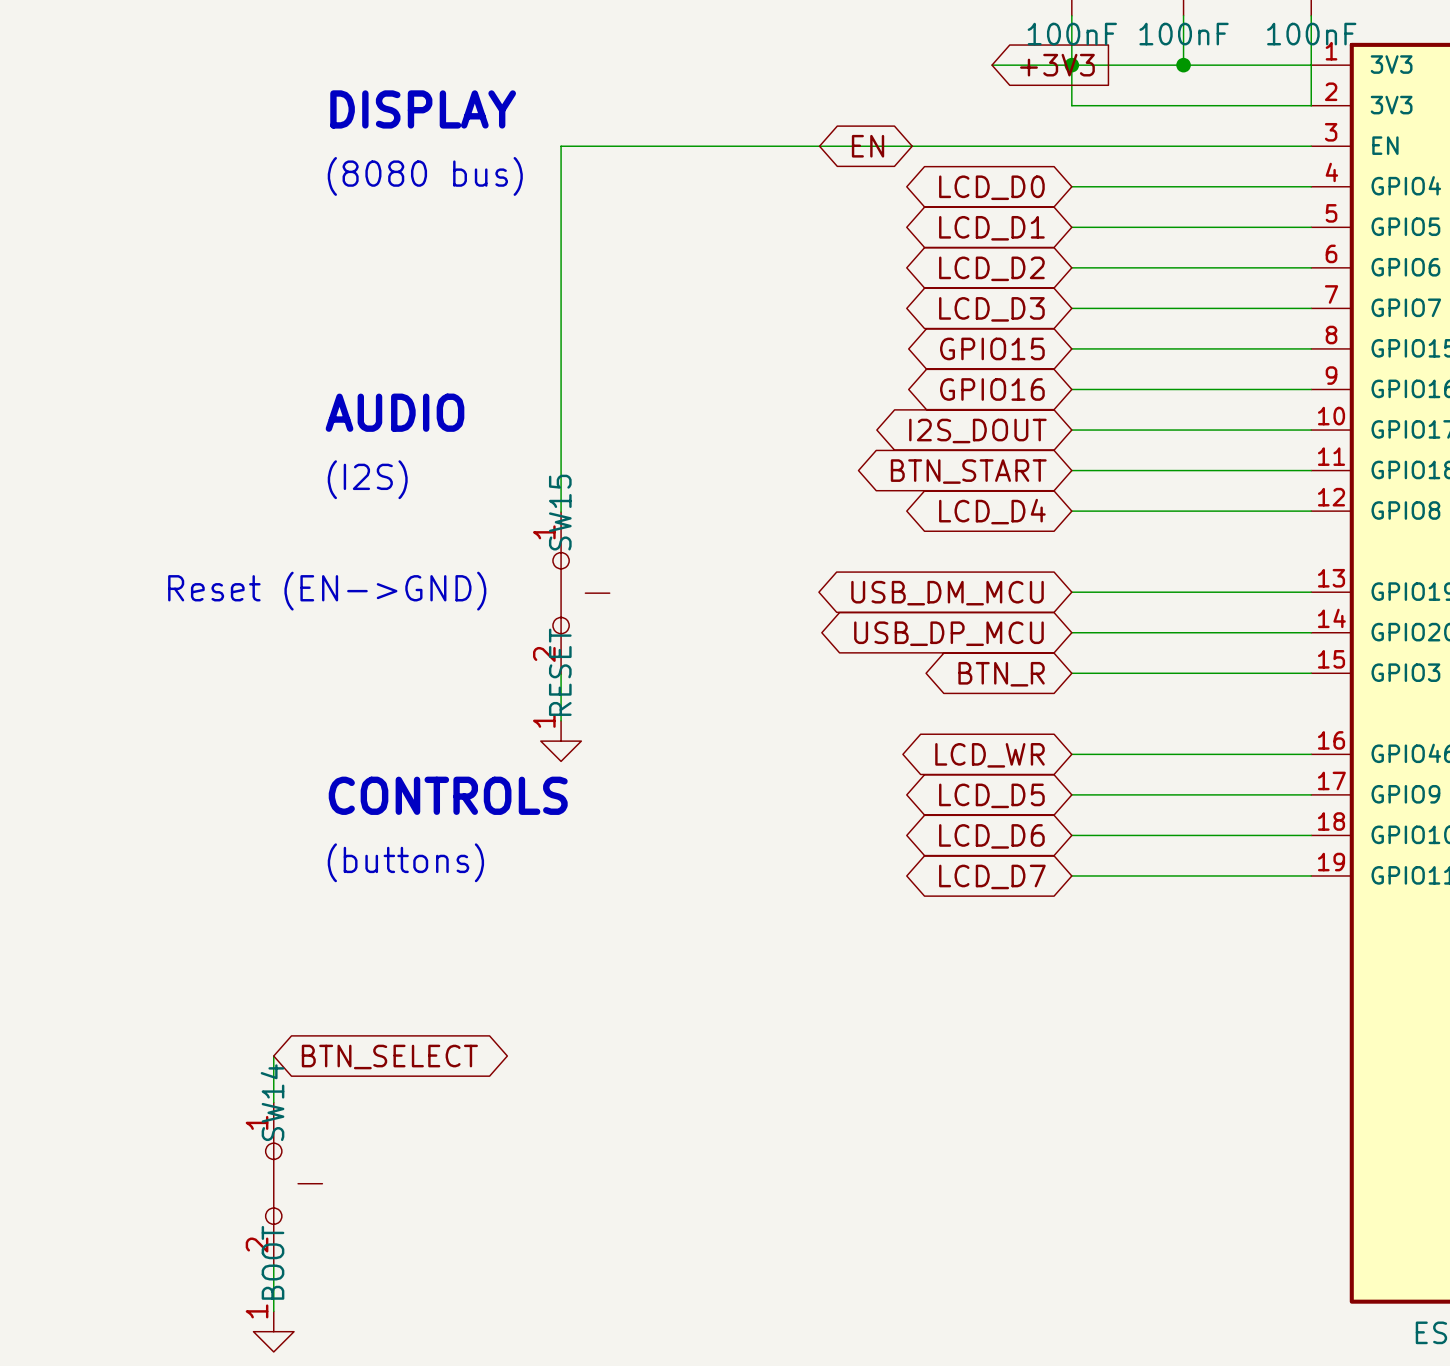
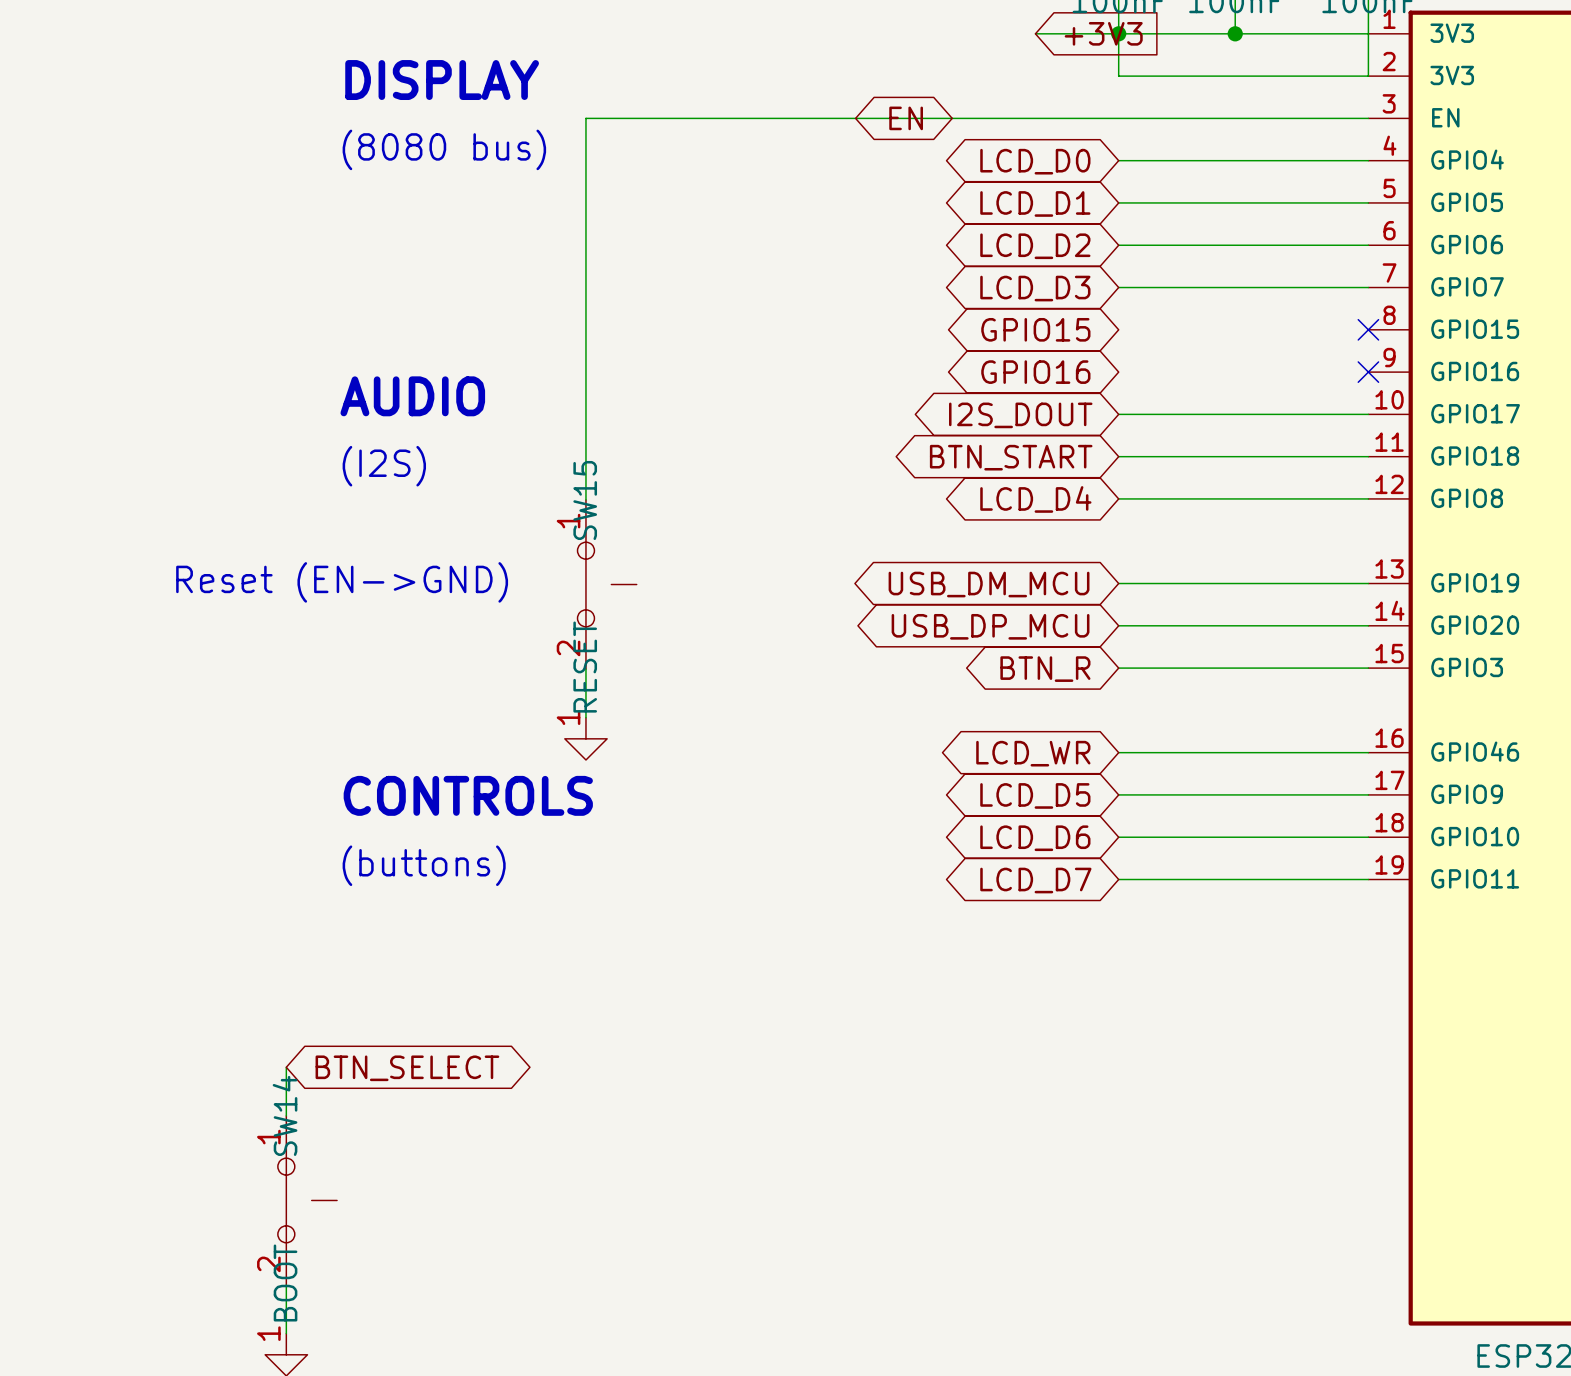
wire: (1071, 348) (1311, 348) -> none
no-connect mark: none -> (1368, 329)
wire: (1071, 389) (1311, 389) -> none
no-connect mark: none -> (1368, 372)

